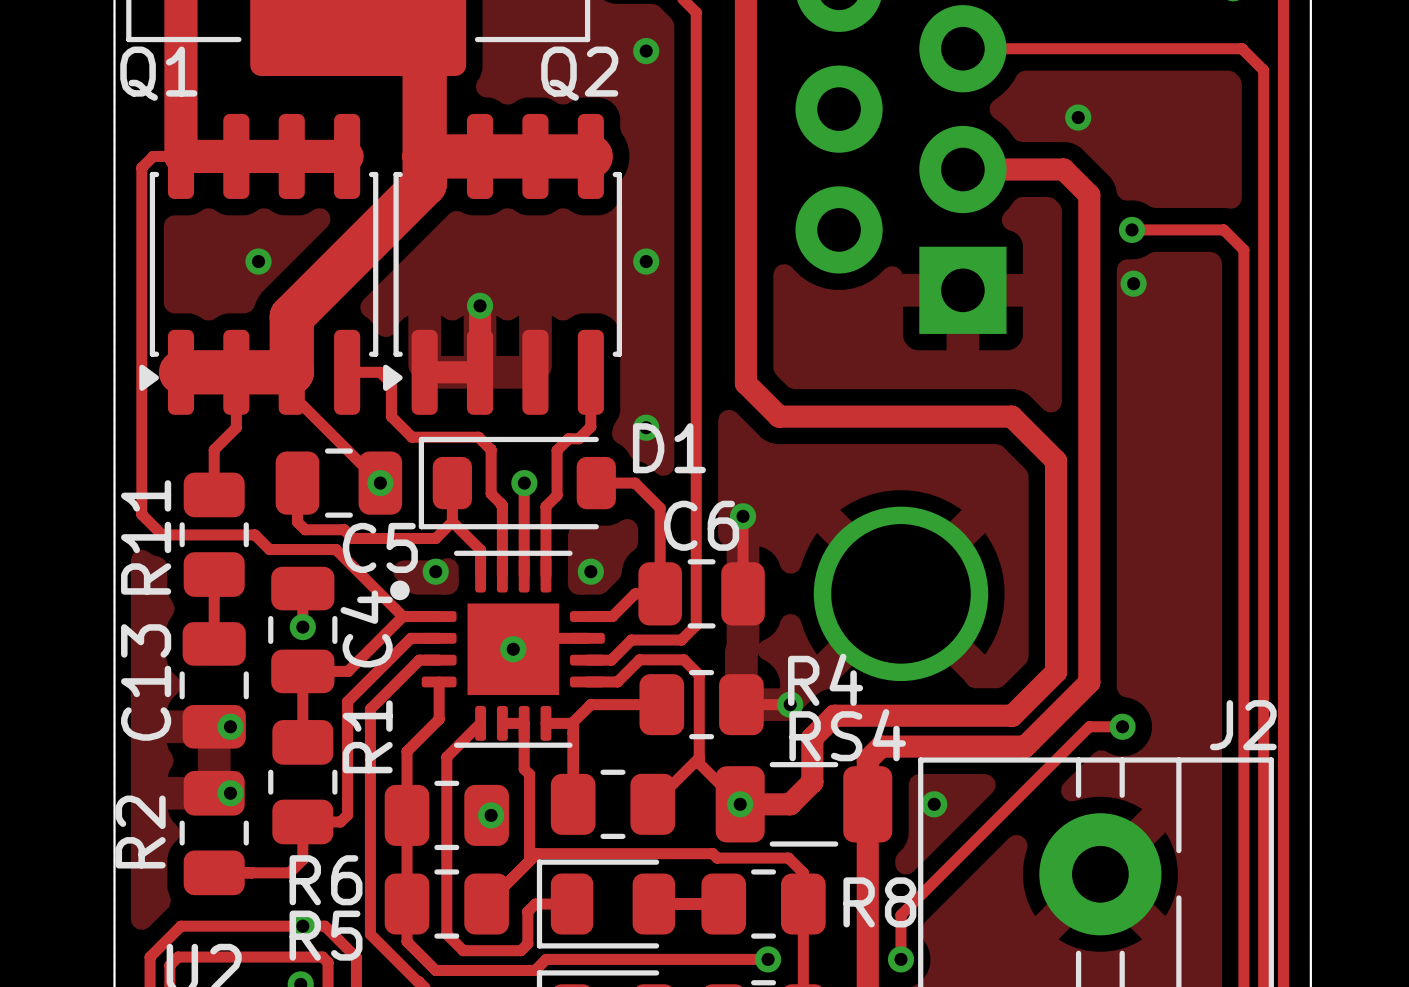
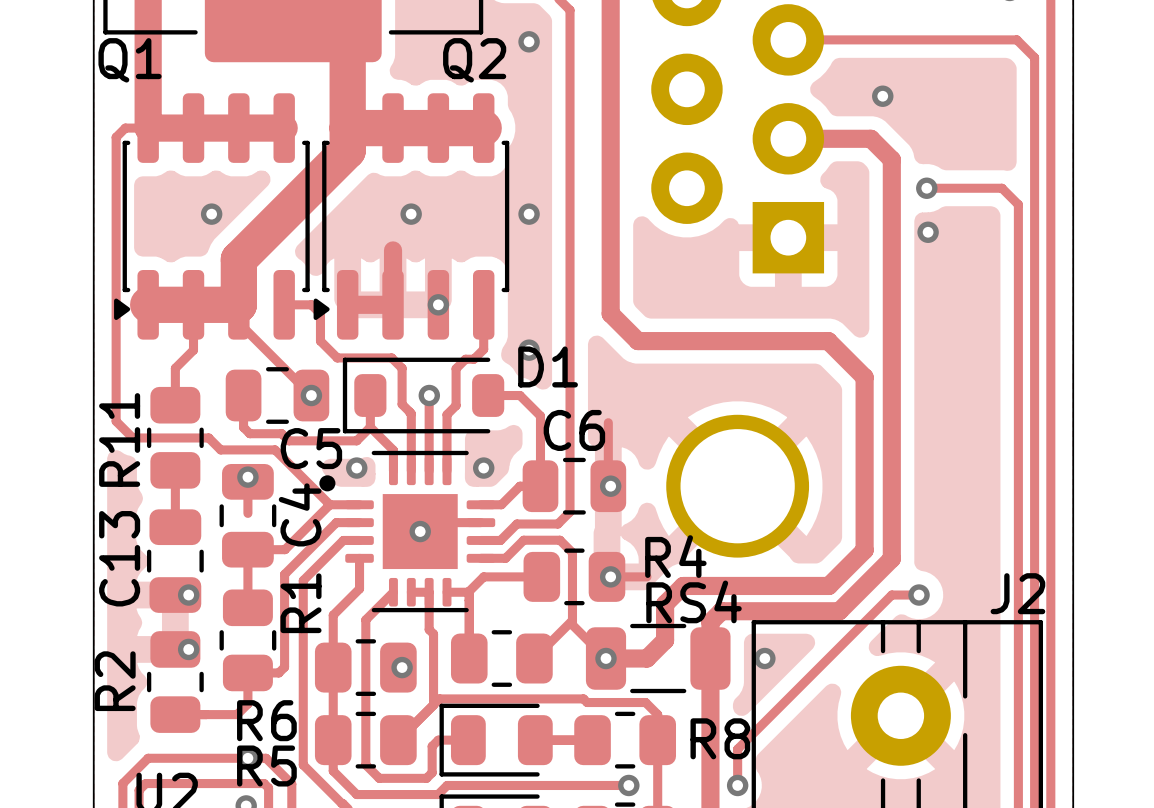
via: none -> (411, 214)
via: (480, 305) -> none
via: none -> (438, 304)
via: (743, 516) -> none
via: none -> (610, 486)
via position: (302, 627) -> (247, 477)
via position: (790, 704) -> (610, 576)

